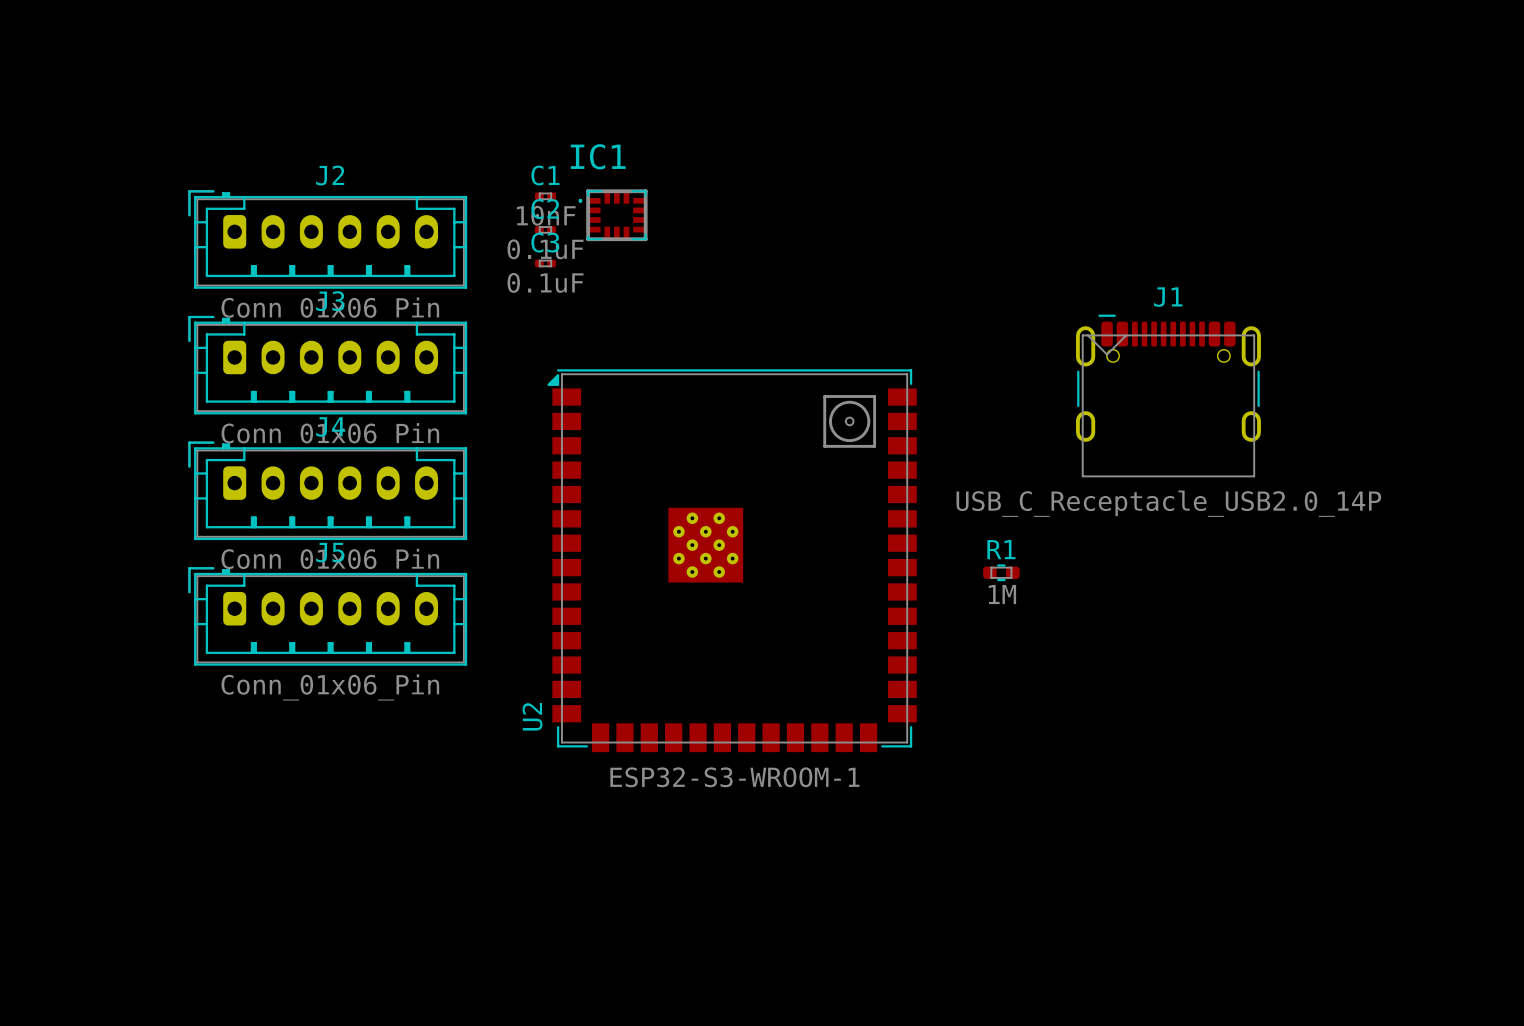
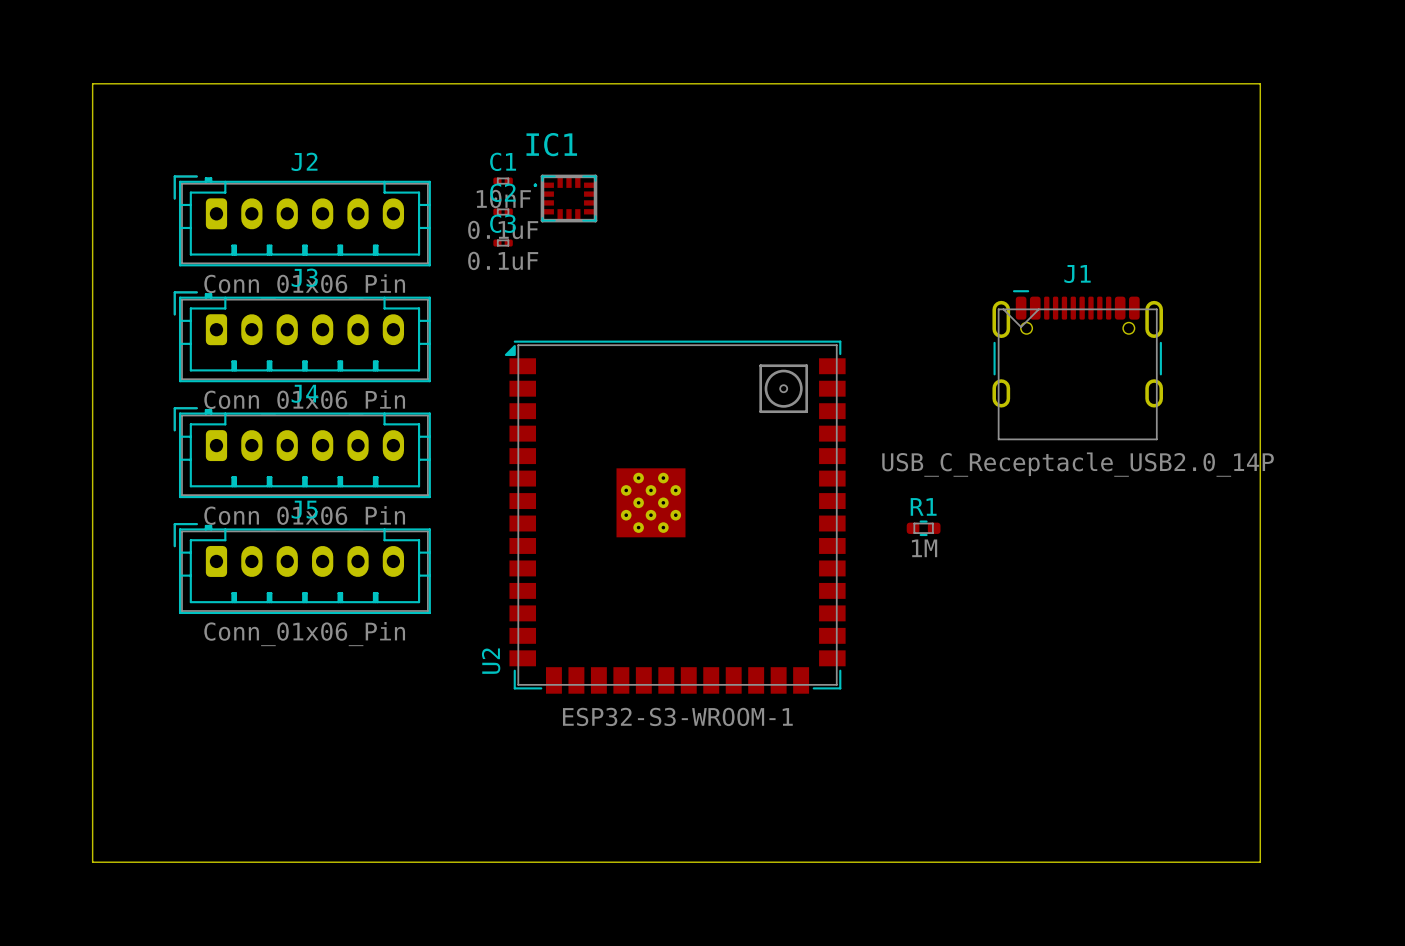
board edge: none -> (92, 83) (1260, 83) (1260, 862) (92, 862) (92, 83)

